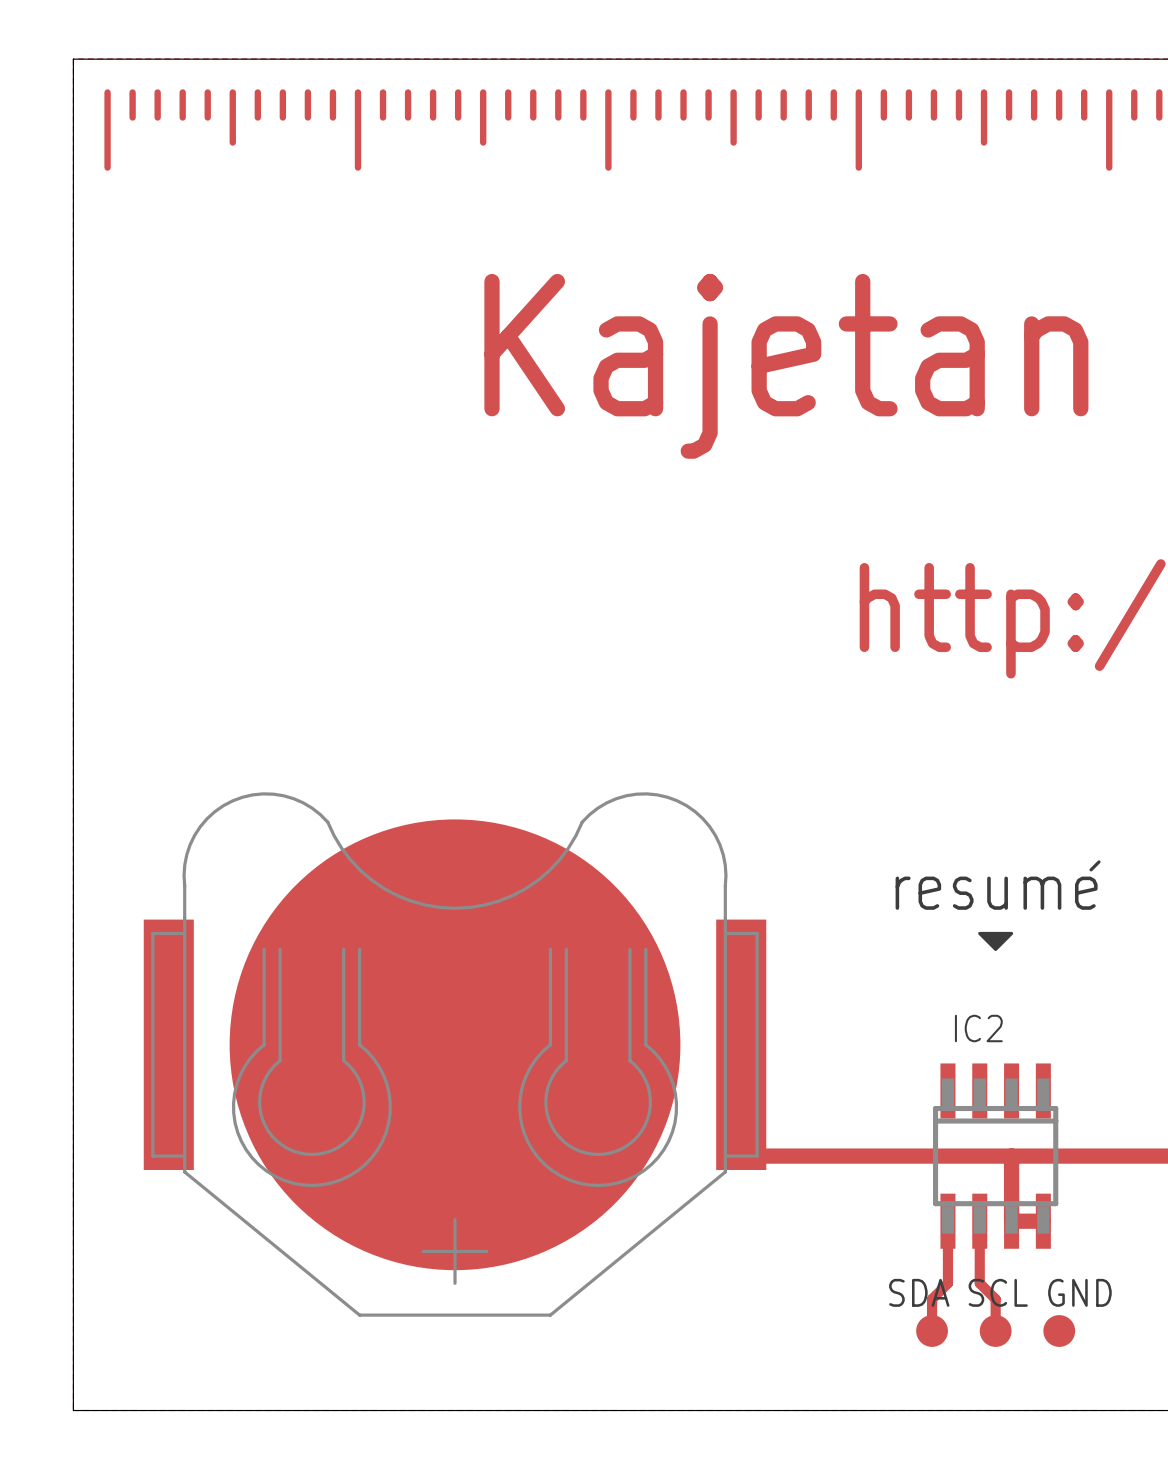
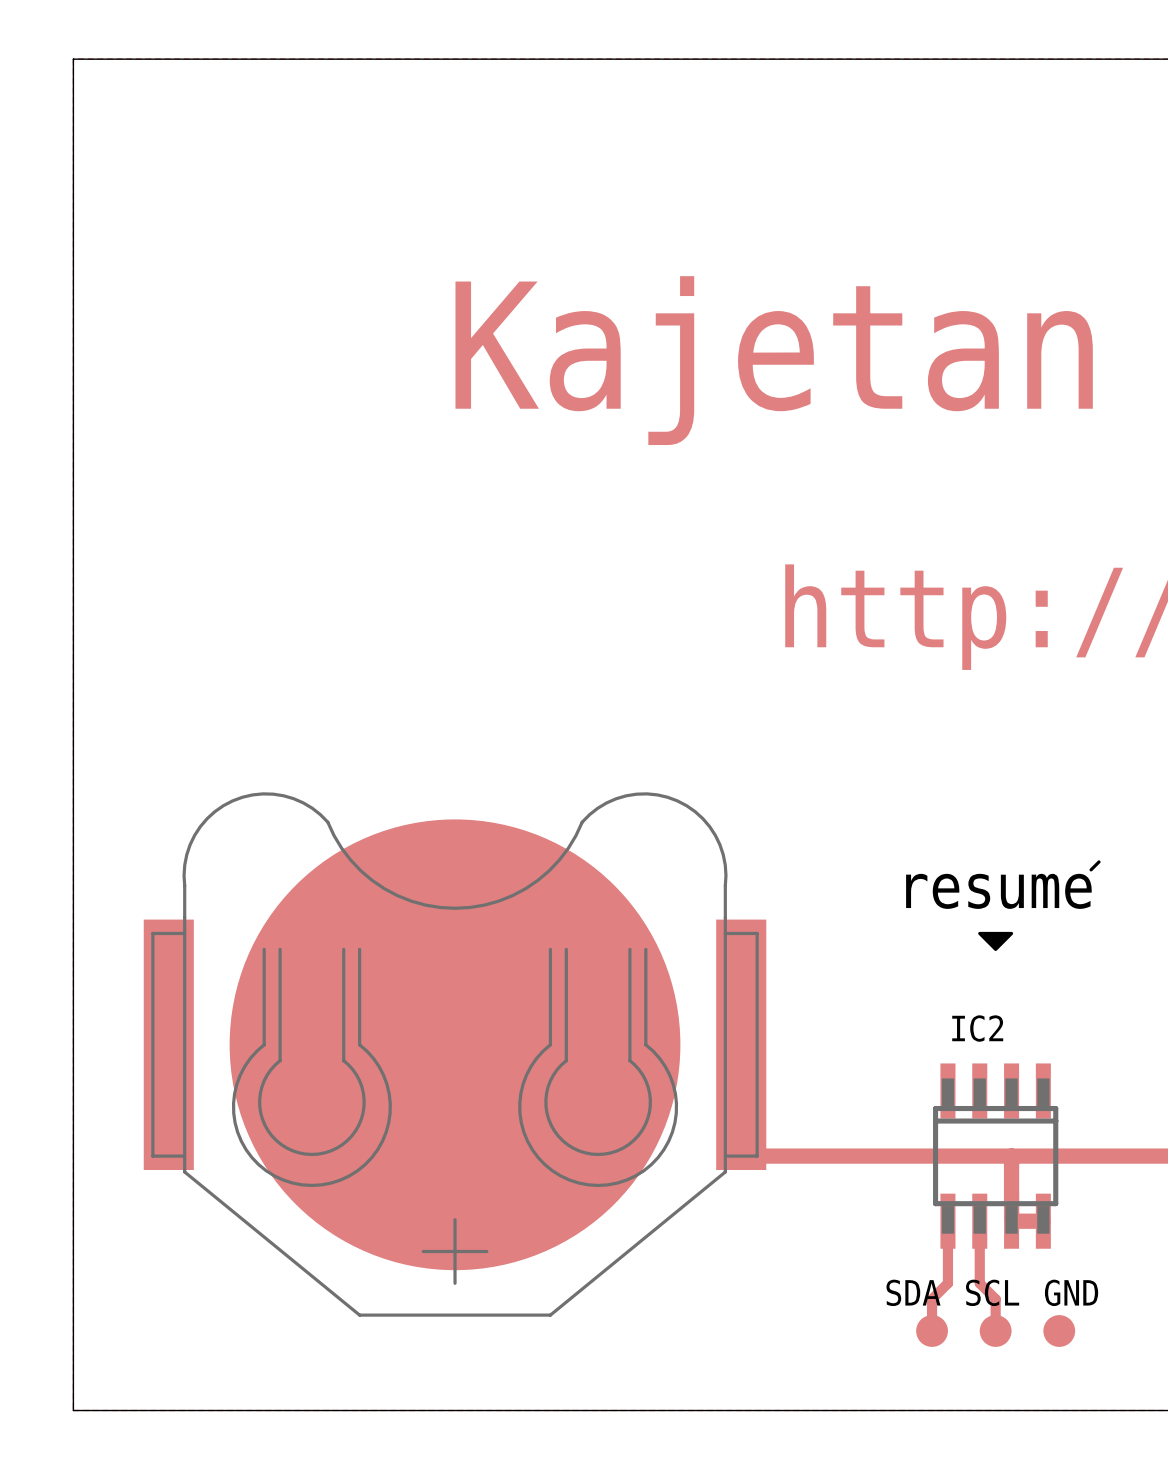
top track: (107, 92) (107, 167) -> none
top track: (132, 92) (132, 117) -> none
top track: (157, 92) (157, 117) -> none
top track: (182, 92) (182, 117) -> none
top track: (207, 92) (207, 117) -> none
top track: (232, 92) (232, 142) -> none
top track: (257, 92) (257, 117) -> none
top track: (282, 92) (282, 117) -> none
top track: (307, 92) (307, 117) -> none
top track: (332, 92) (332, 117) -> none
top track: (357, 92) (357, 167) -> none
top track: (383, 92) (383, 117) -> none
top track: (408, 92) (408, 117) -> none
top track: (433, 92) (433, 117) -> none
top track: (458, 92) (458, 117) -> none
top track: (483, 92) (483, 142) -> none
top track: (508, 92) (508, 117) -> none
top track: (533, 92) (533, 117) -> none
top track: (558, 92) (558, 117) -> none
top track: (583, 92) (583, 117) -> none
top track: (608, 92) (608, 167) -> none
top track: (633, 92) (633, 117) -> none
top track: (658, 92) (658, 117) -> none
top track: (683, 92) (683, 117) -> none
top track: (708, 92) (708, 117) -> none
top track: (733, 92) (733, 142) -> none
top track: (758, 92) (758, 117) -> none
top track: (783, 92) (783, 117) -> none
top track: (808, 92) (808, 117) -> none
top track: (833, 92) (833, 117) -> none
top track: (858, 92) (858, 167) -> none
top track: (883, 92) (883, 117) -> none
top track: (908, 92) (908, 117) -> none
top track: (933, 92) (933, 117) -> none
top track: (958, 92) (958, 117) -> none
top track: (984, 92) (984, 142) -> none
top track: (1009, 92) (1009, 117) -> none
top track: (1034, 92) (1034, 117) -> none
top track: (1059, 92) (1059, 117) -> none
top track: (1084, 92) (1084, 117) -> none
top track: (1109, 92) (1109, 167) -> none
top track: (1134, 92) (1134, 117) -> none
top track: (1159, 92) (1159, 117) -> none

